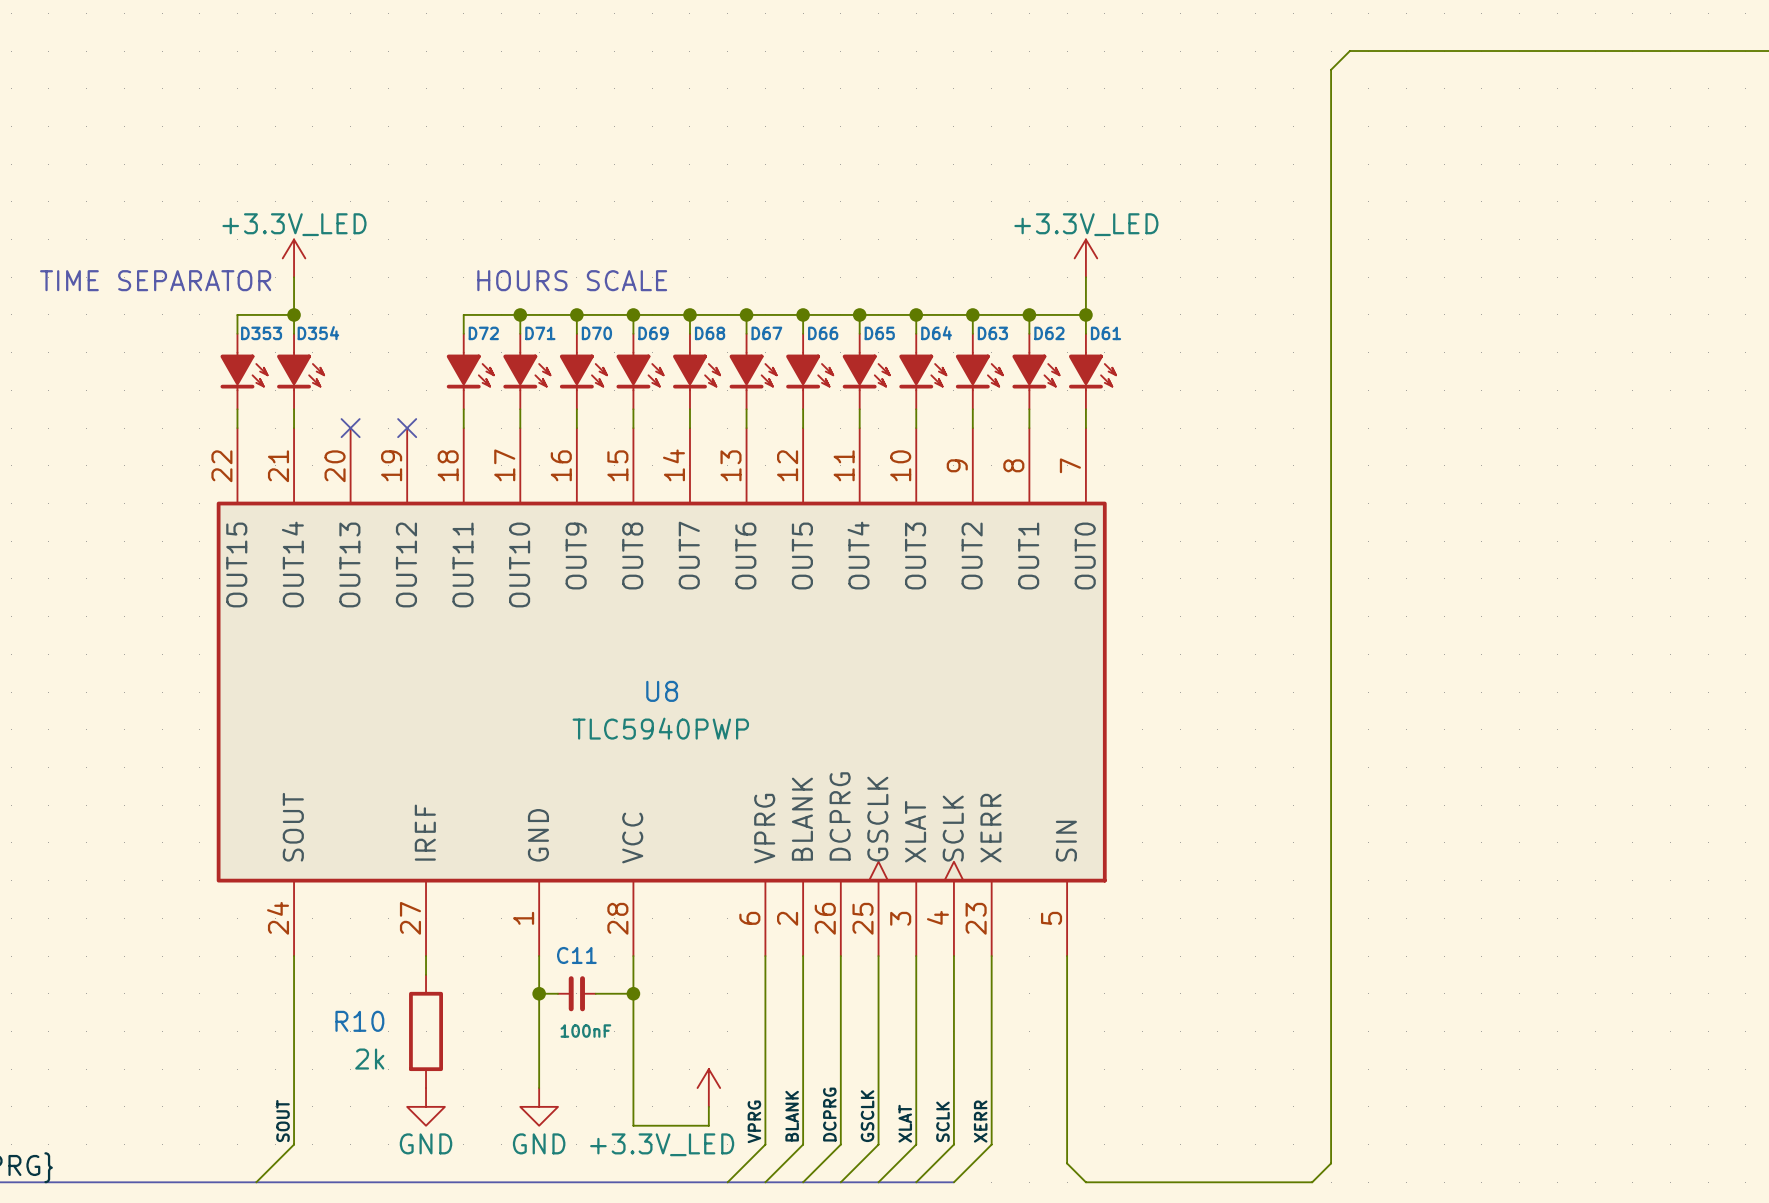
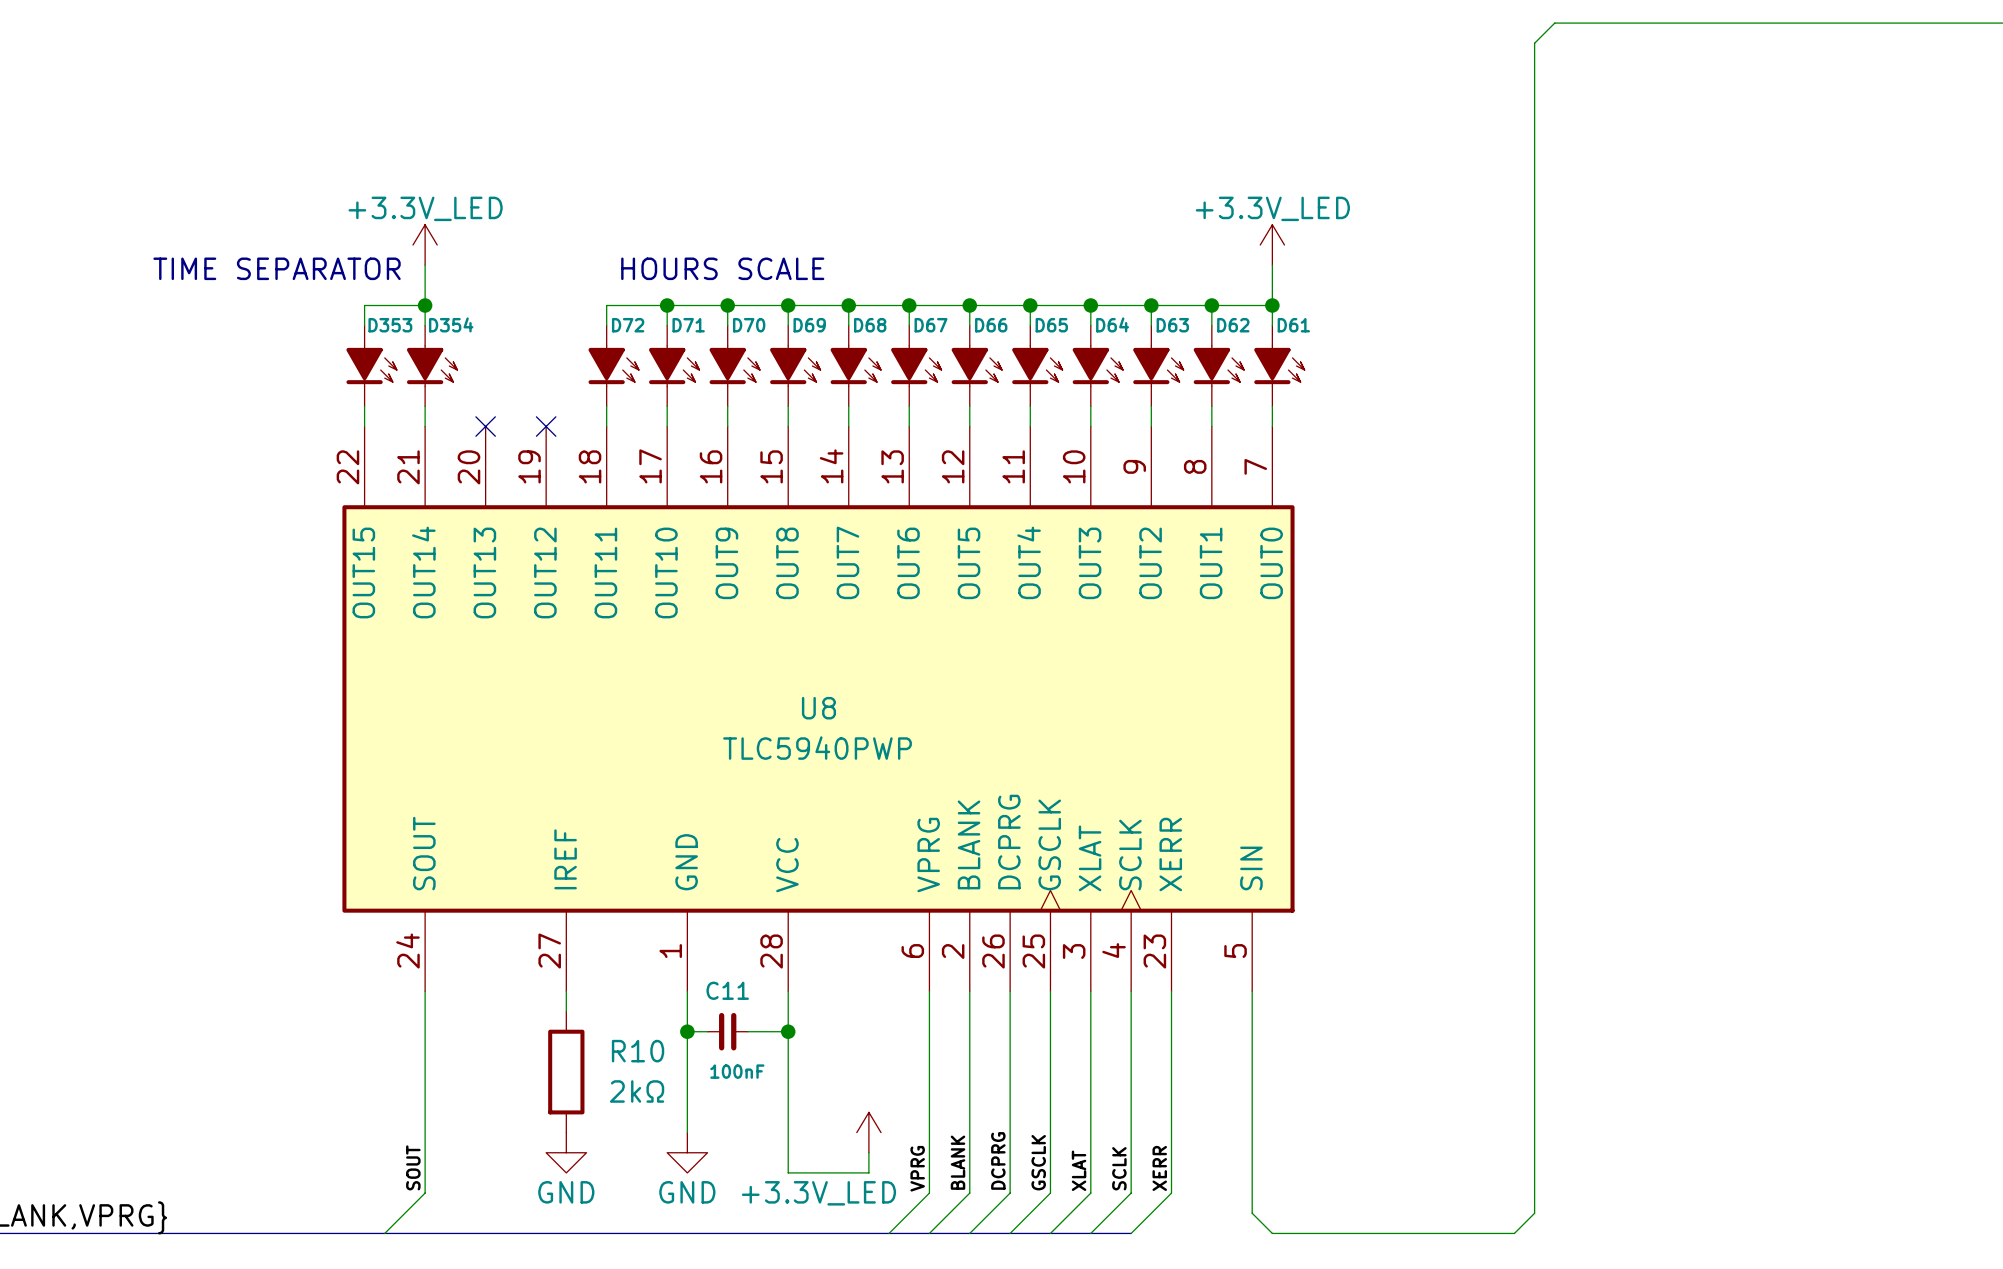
R10 name position: R10 (359, 1021) -> R10 (638, 1051)
R10 value: 2k (369, 1059) -> 2kΩ (637, 1091)

